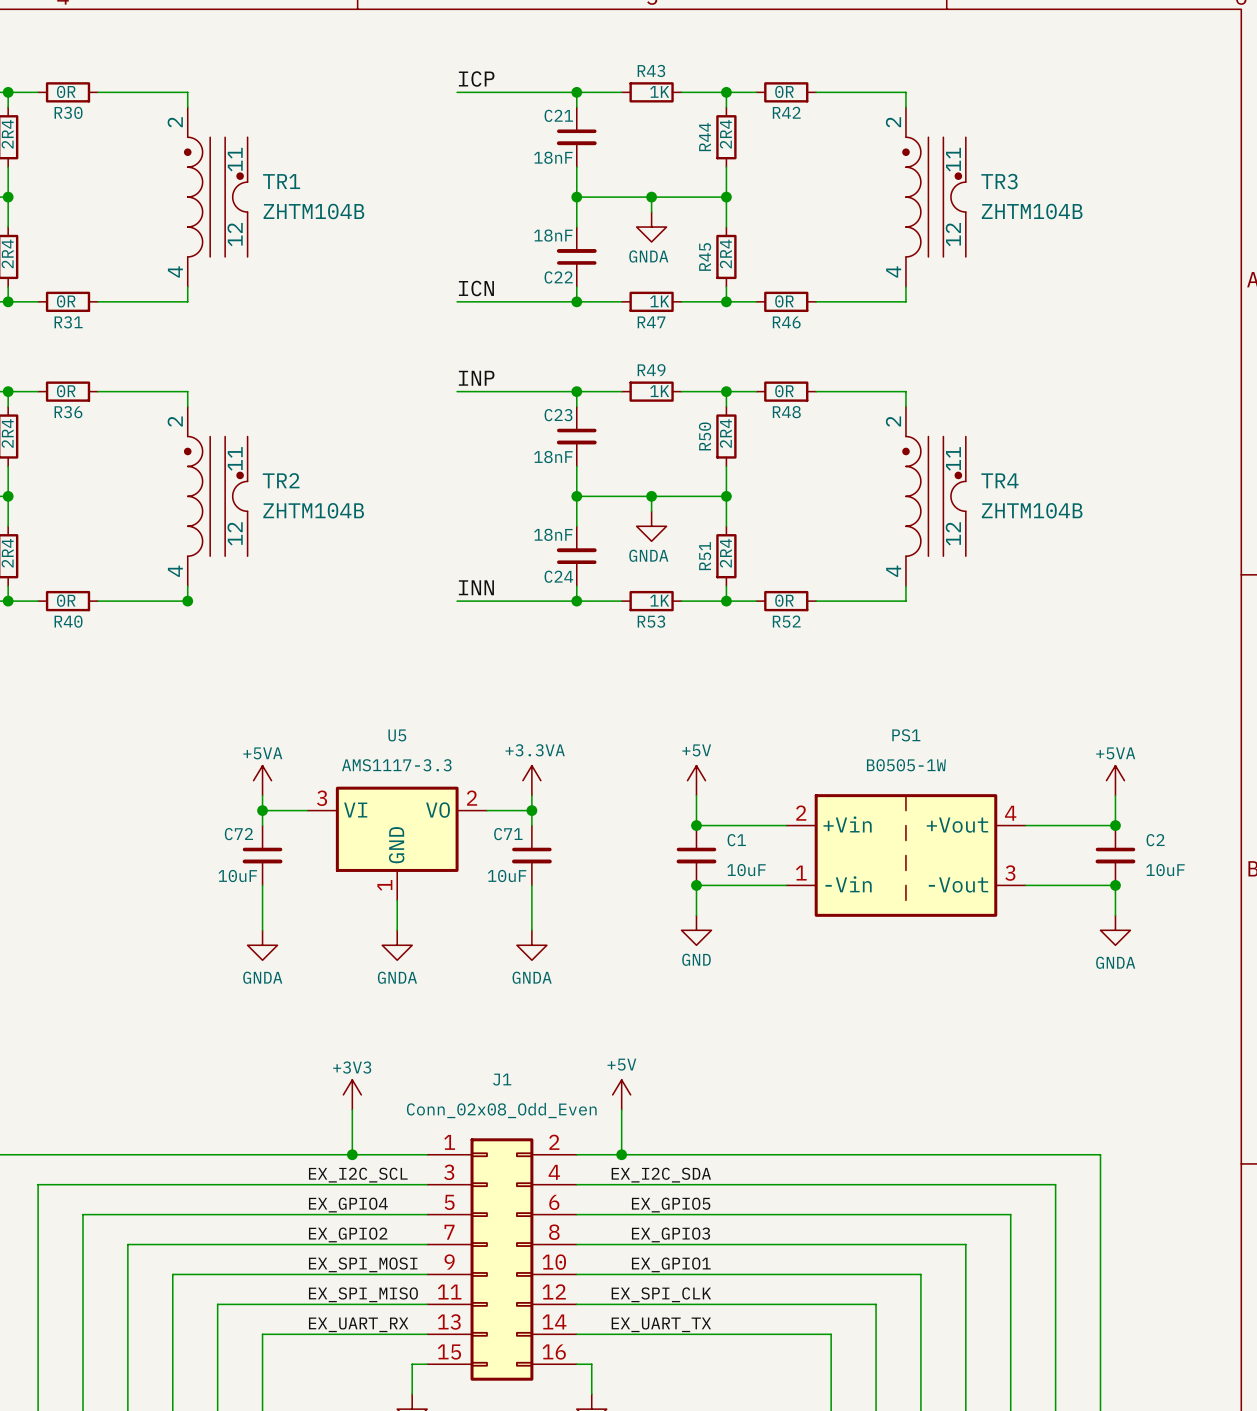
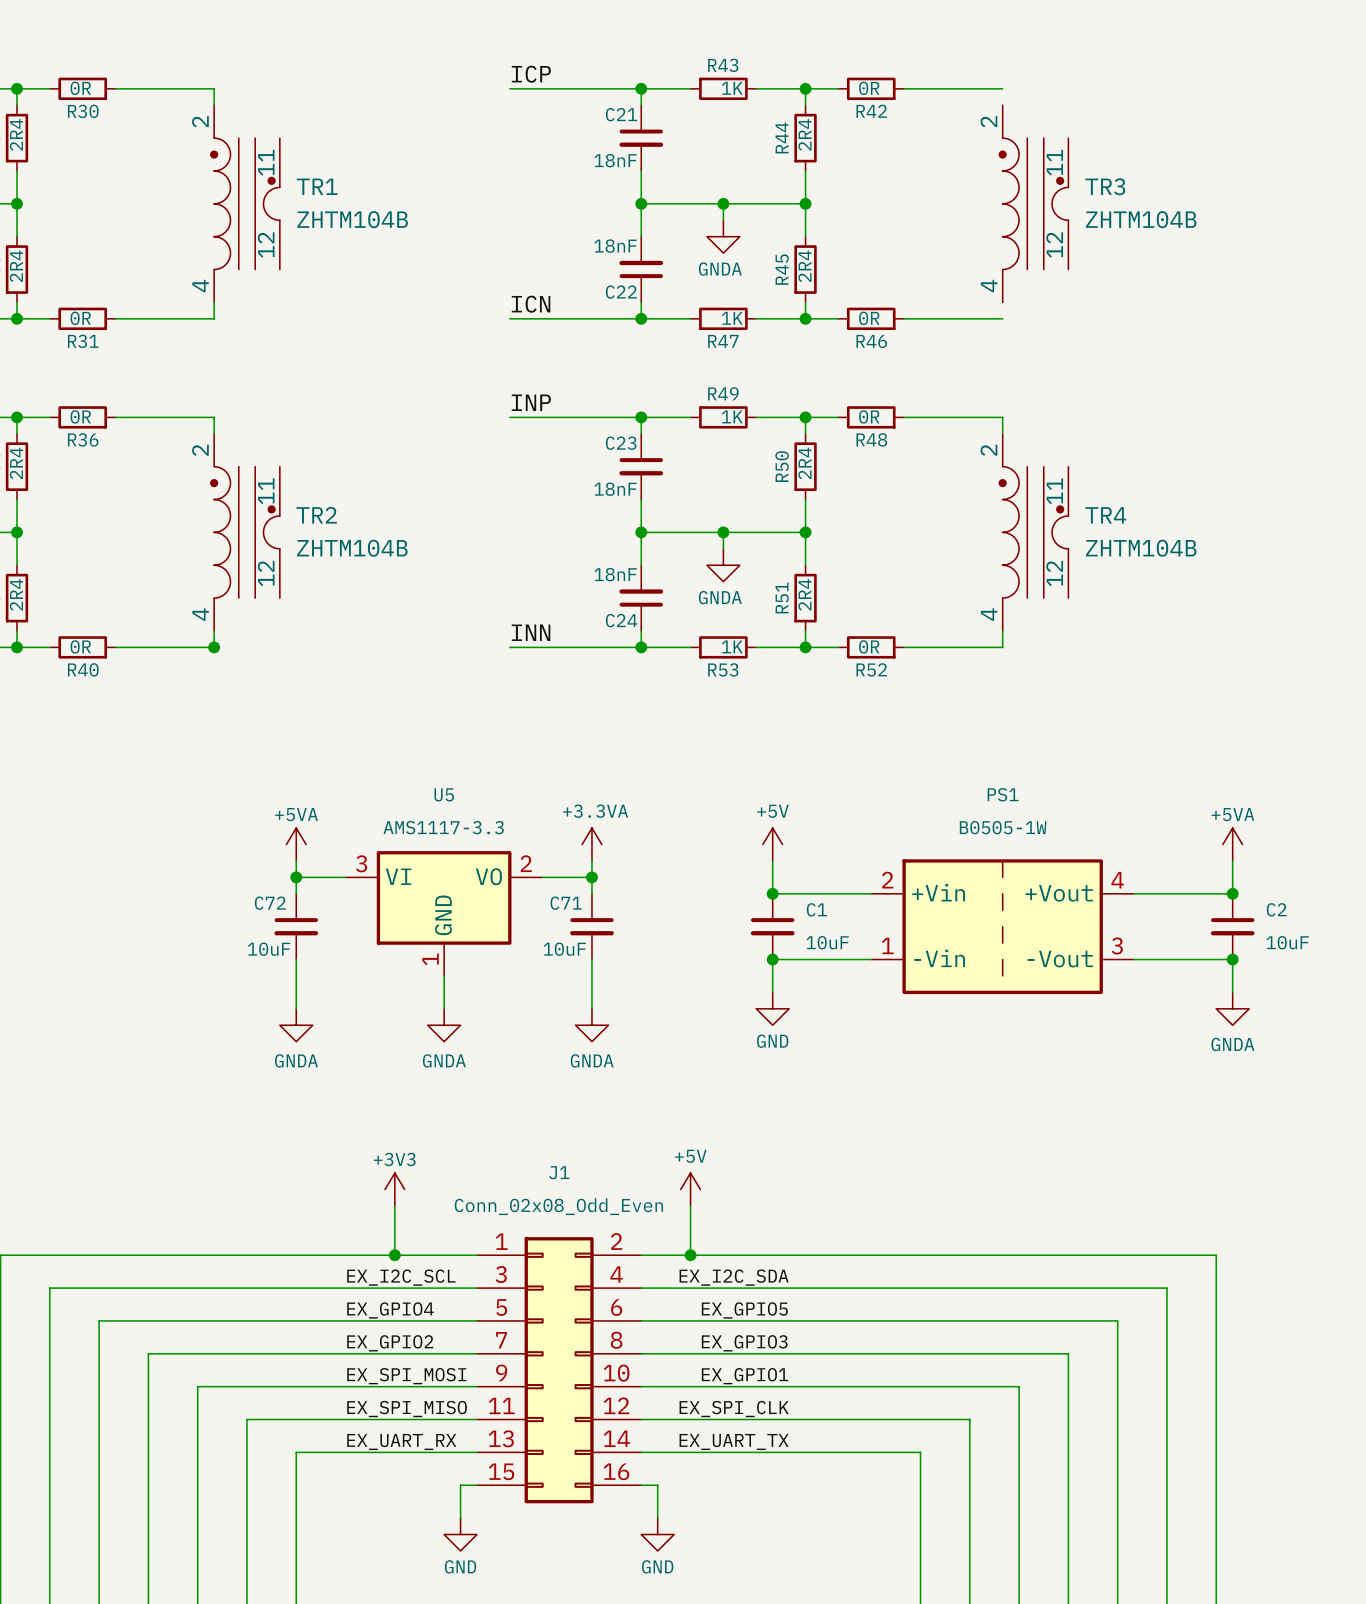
wire: (905, 92) (905, 107) -> none
wire: (905, 286) (905, 301) -> none

